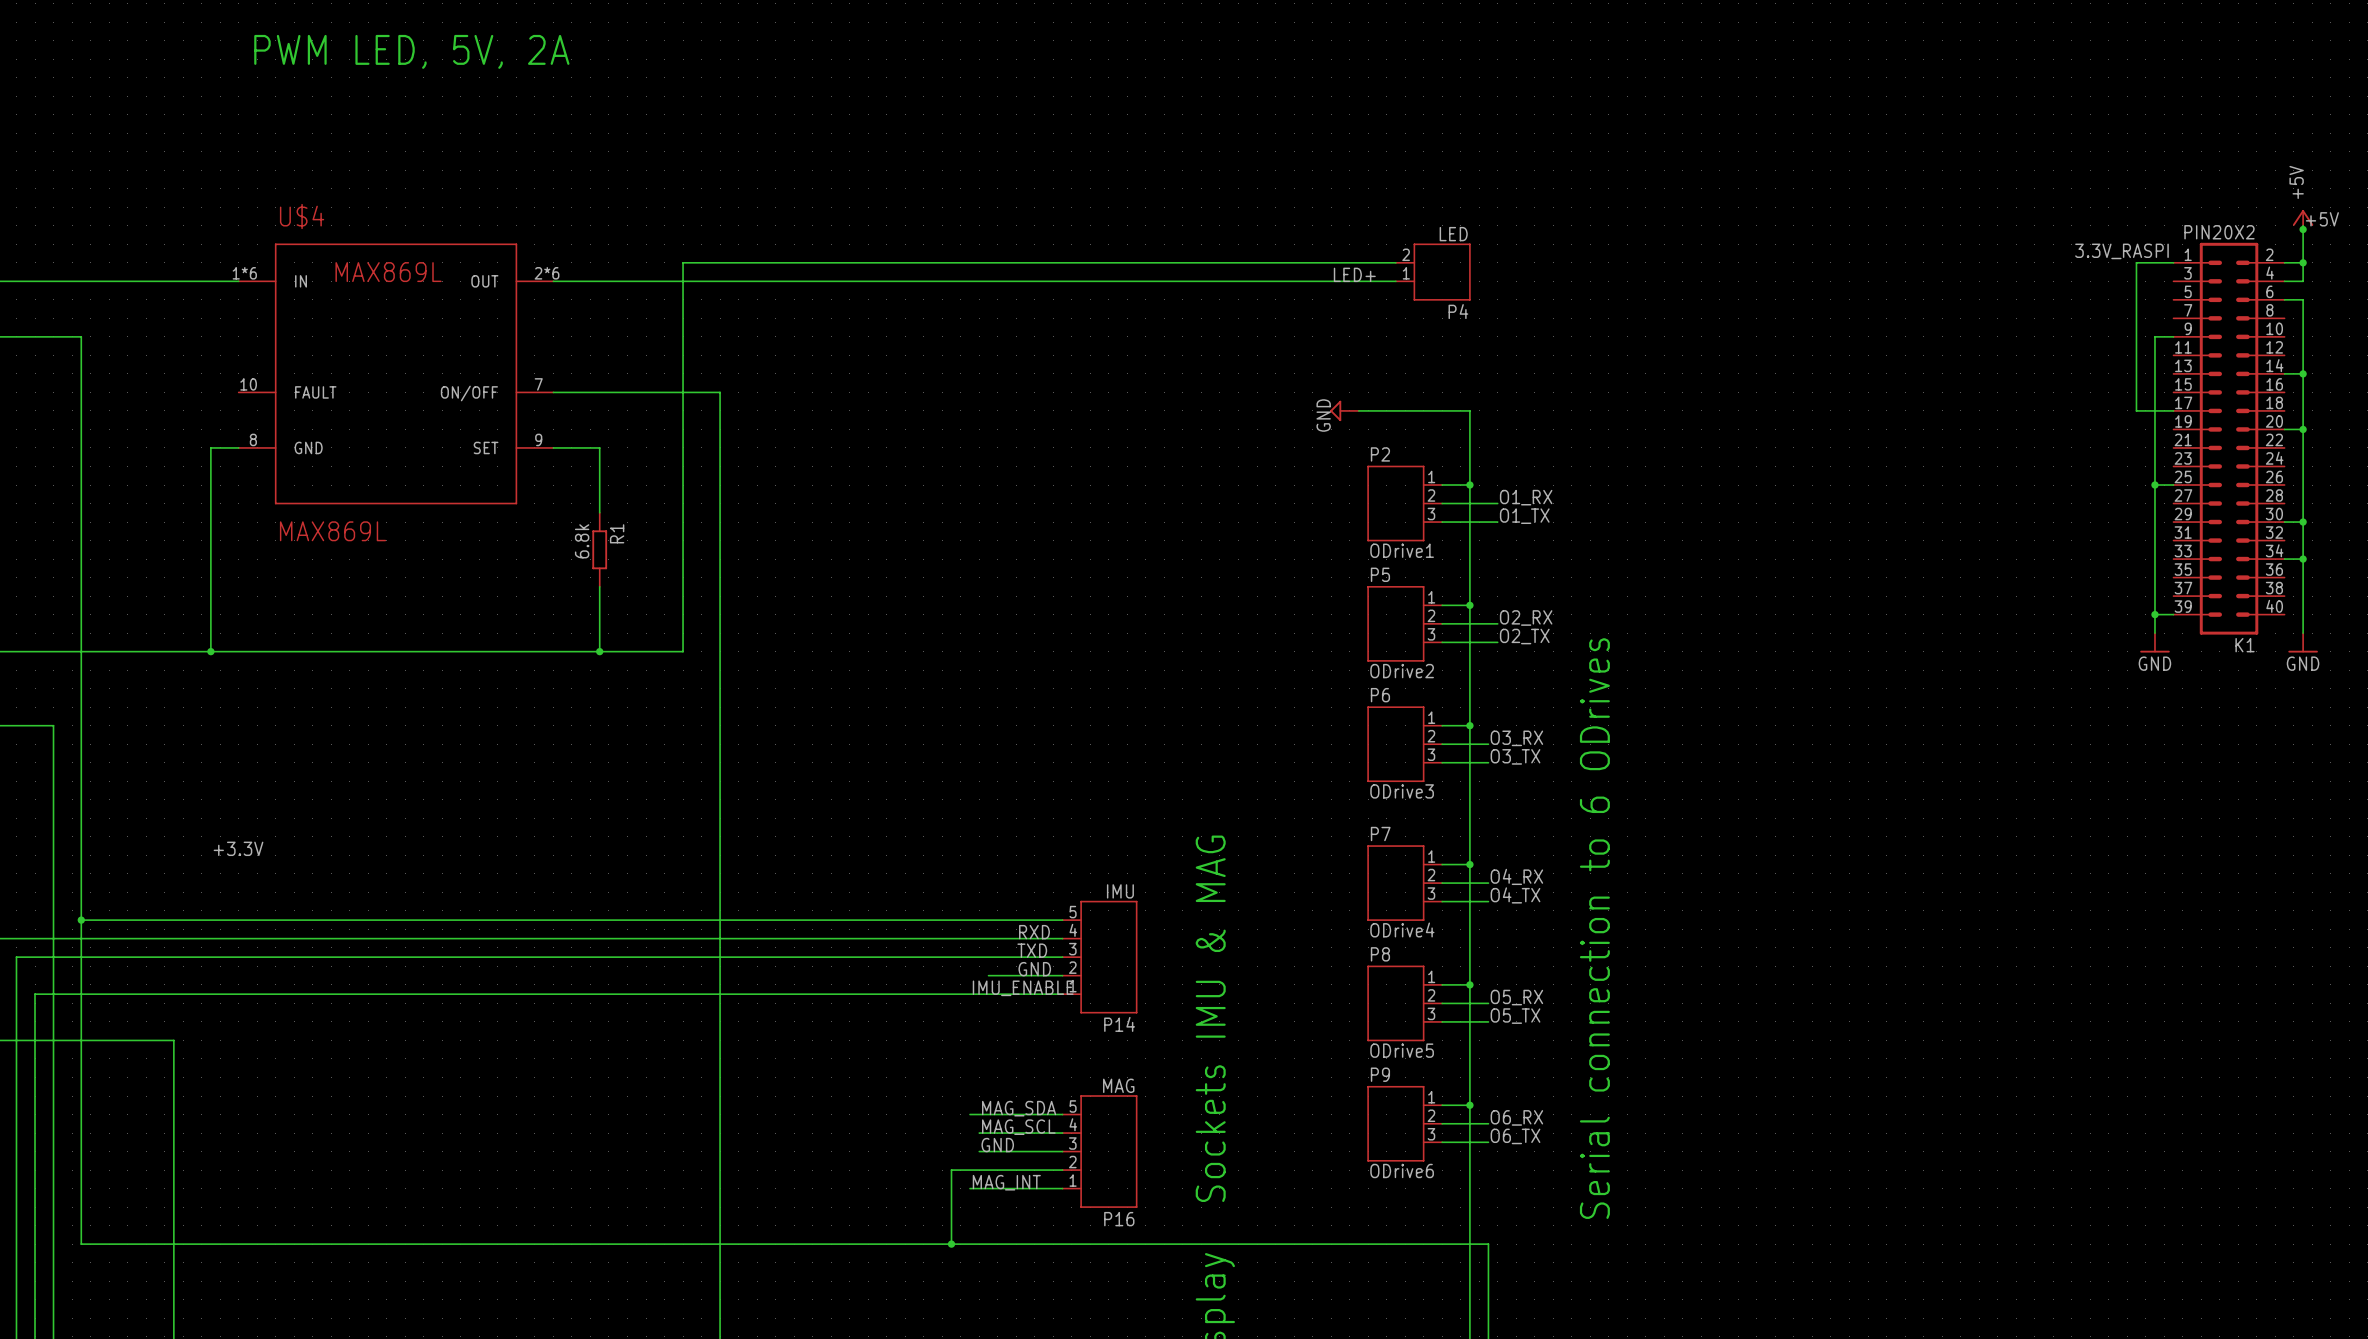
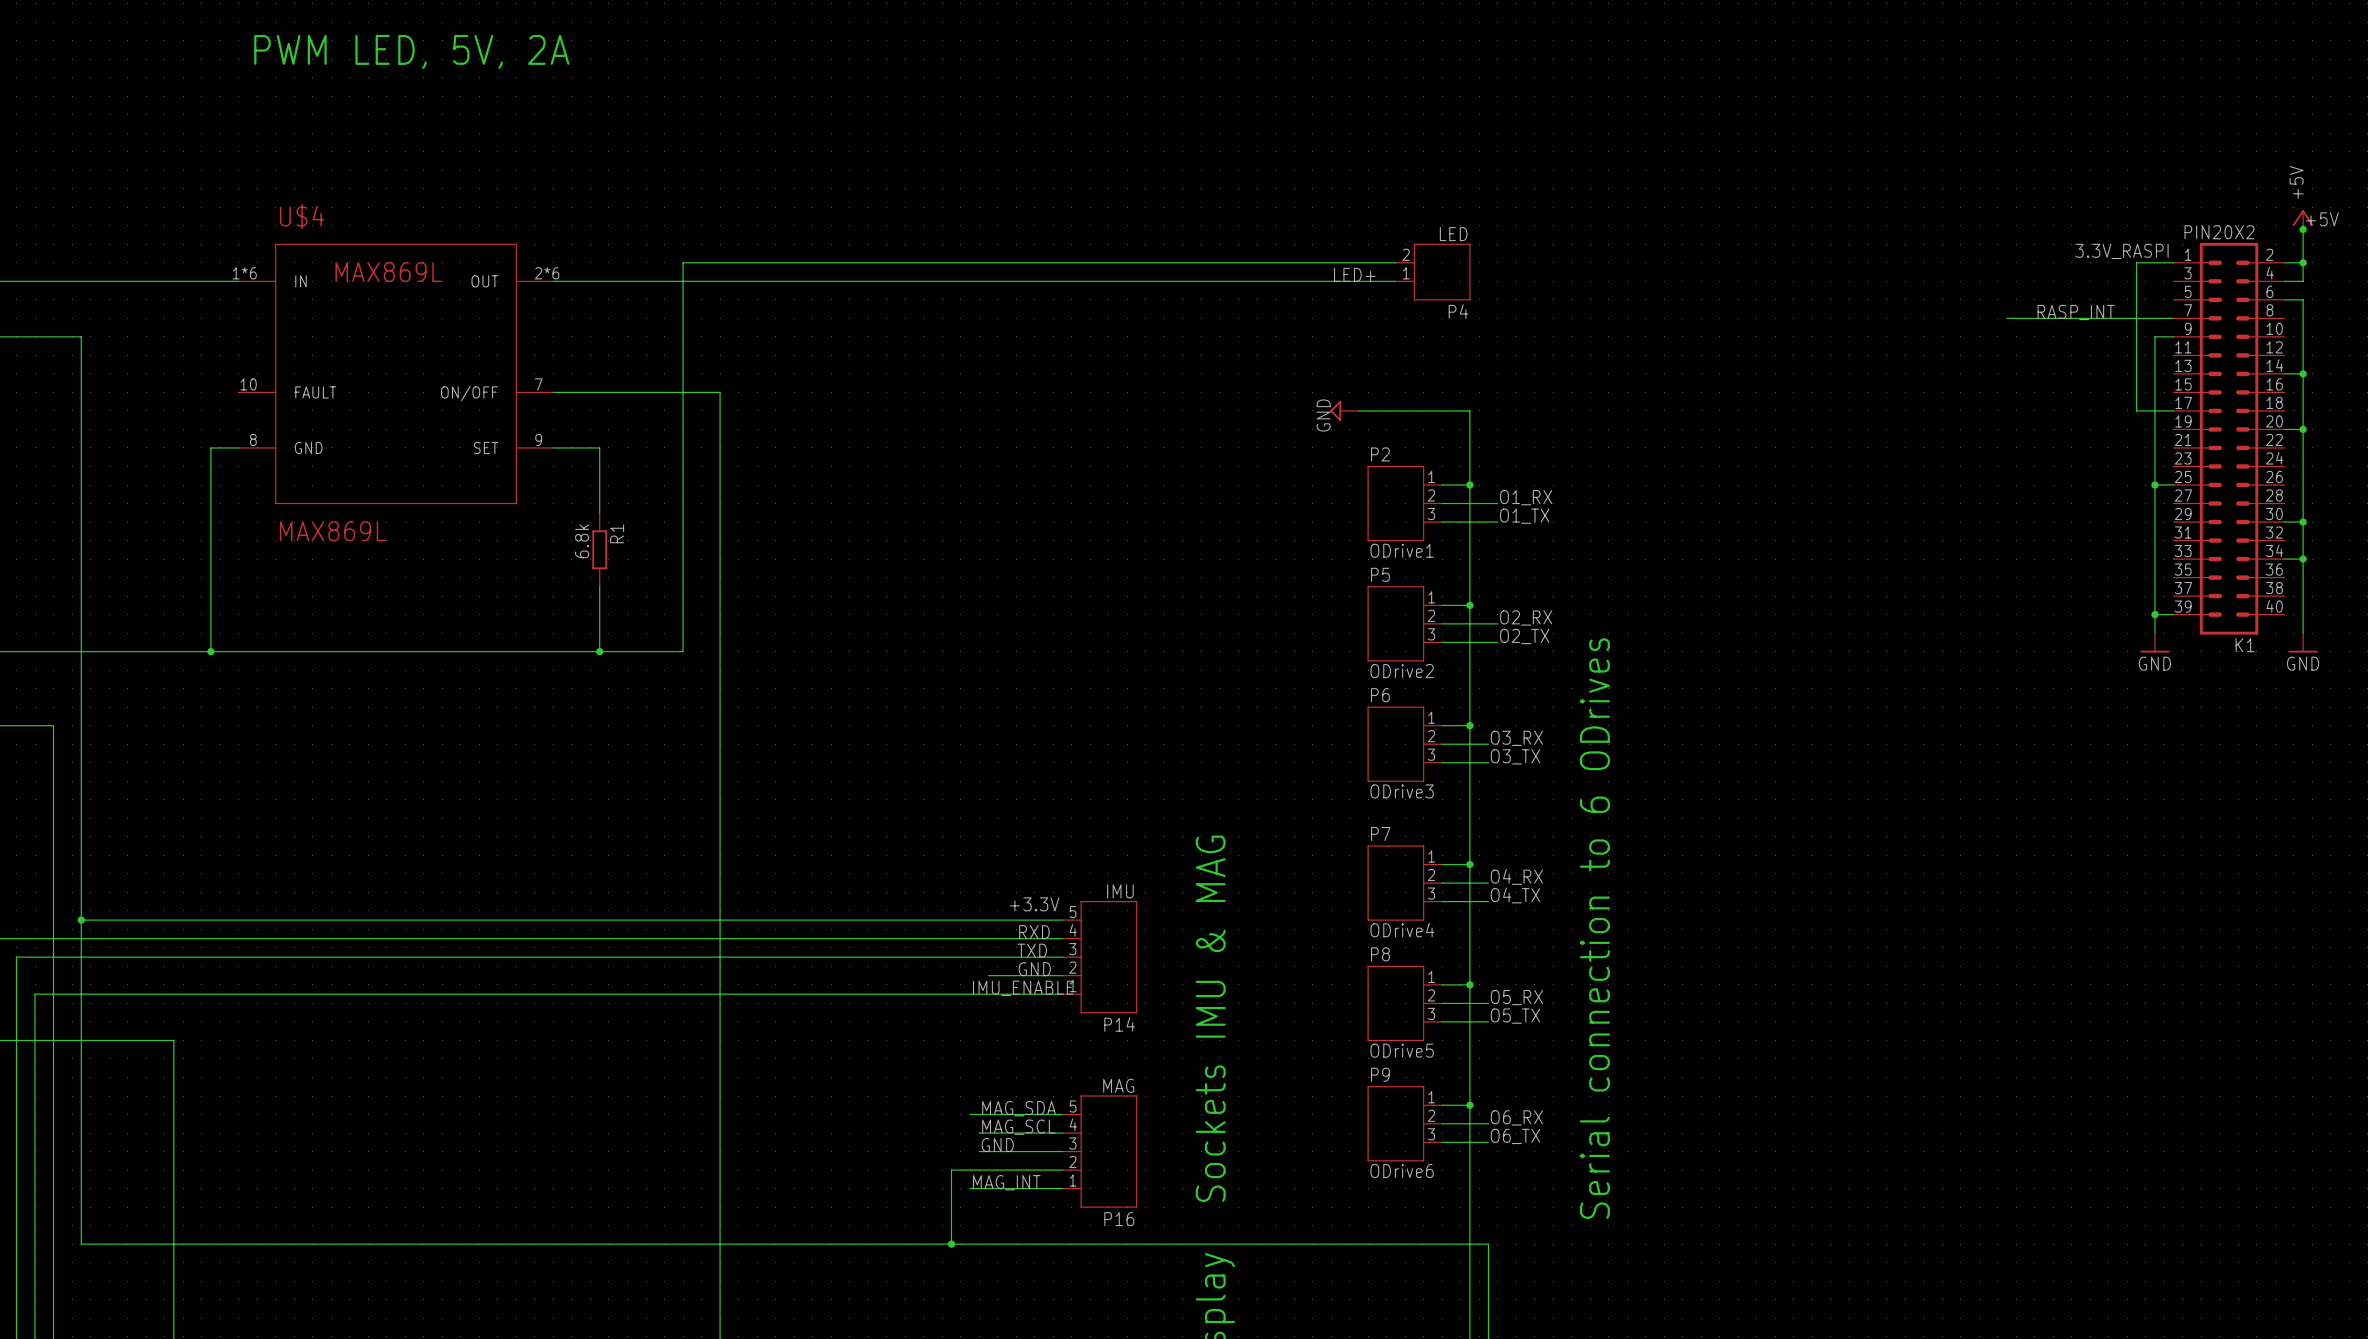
label: none -> RASP_INT (2076, 312)
wire: none -> (2006, 318) (2173, 318)
label: +3.3V (238, 848) -> none
label: none -> +3.3V (1034, 904)

